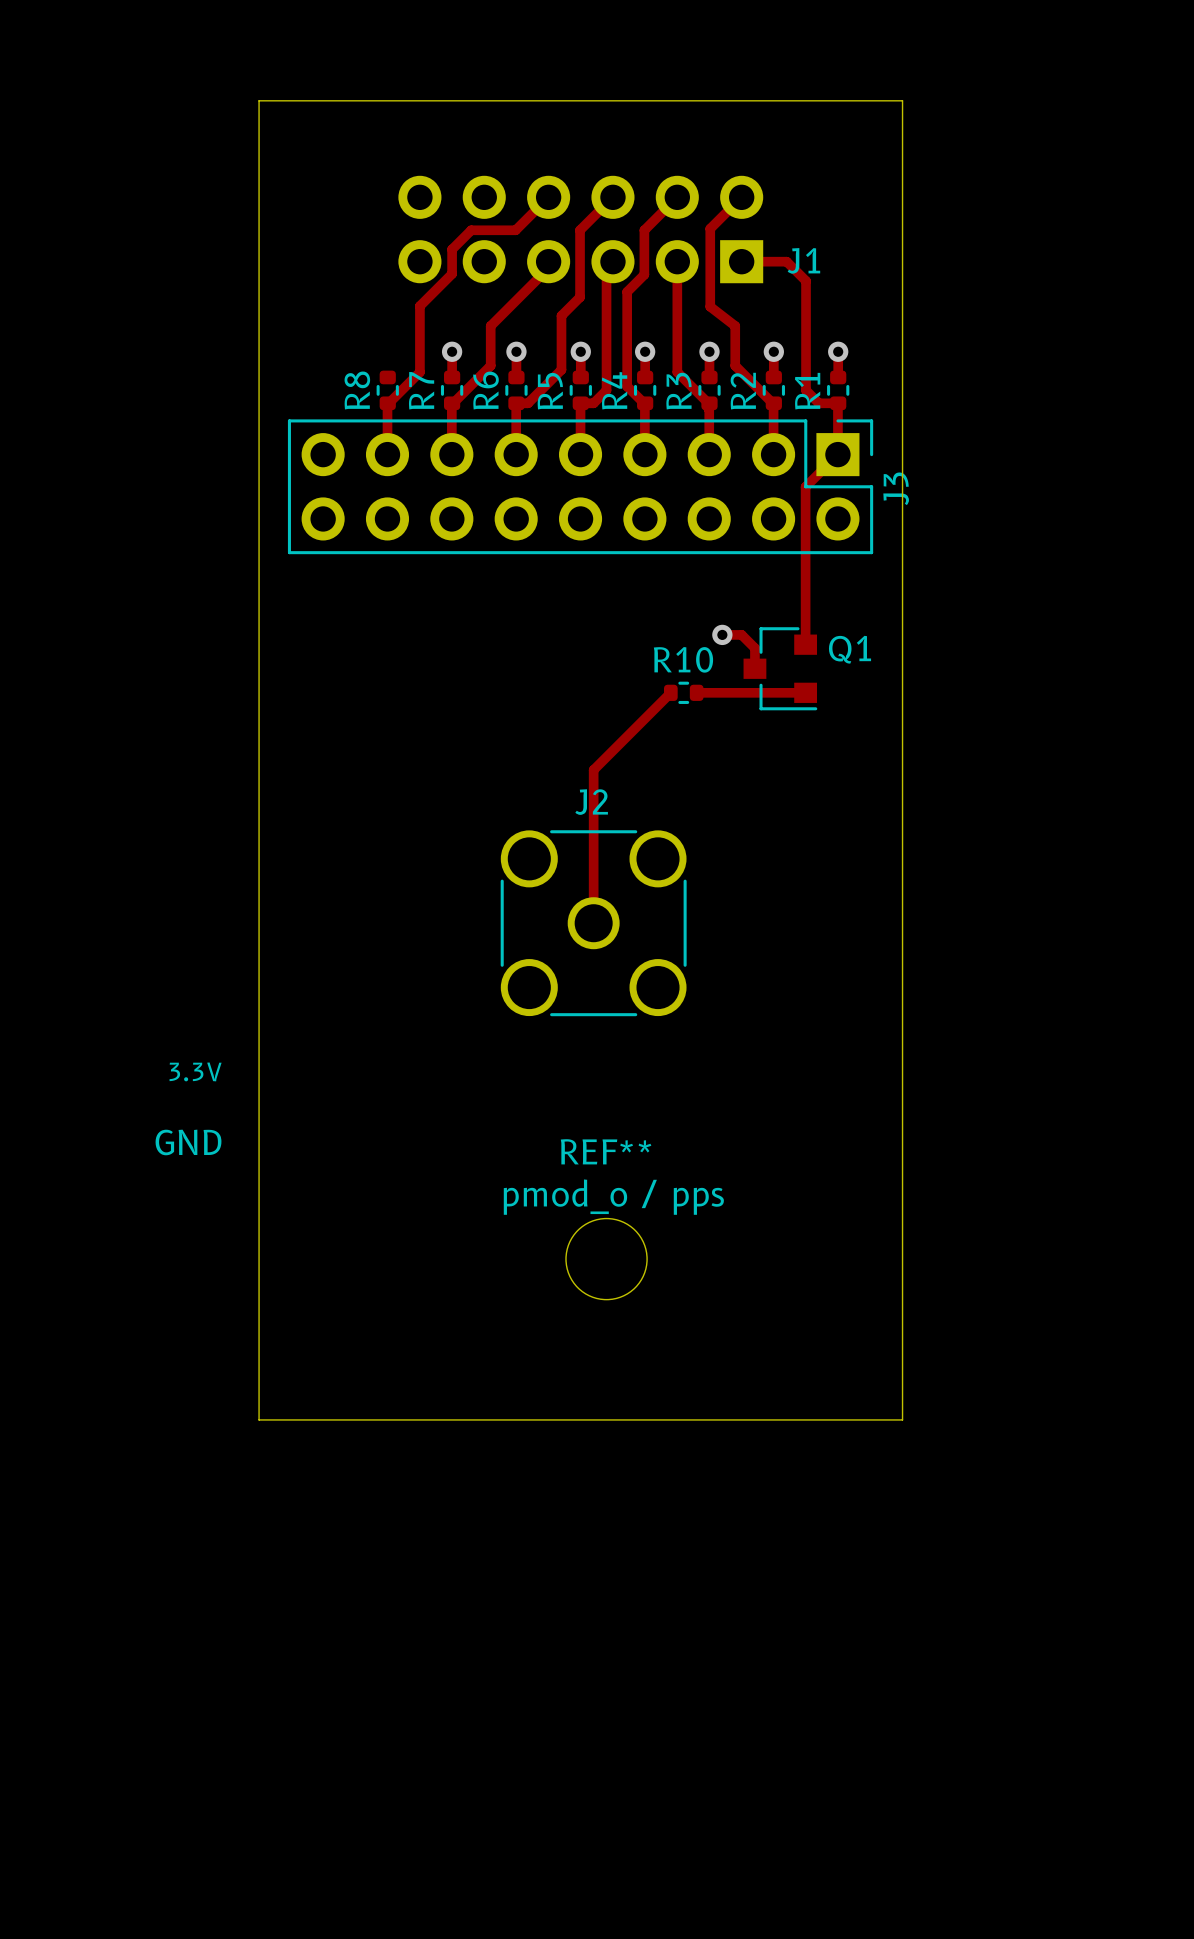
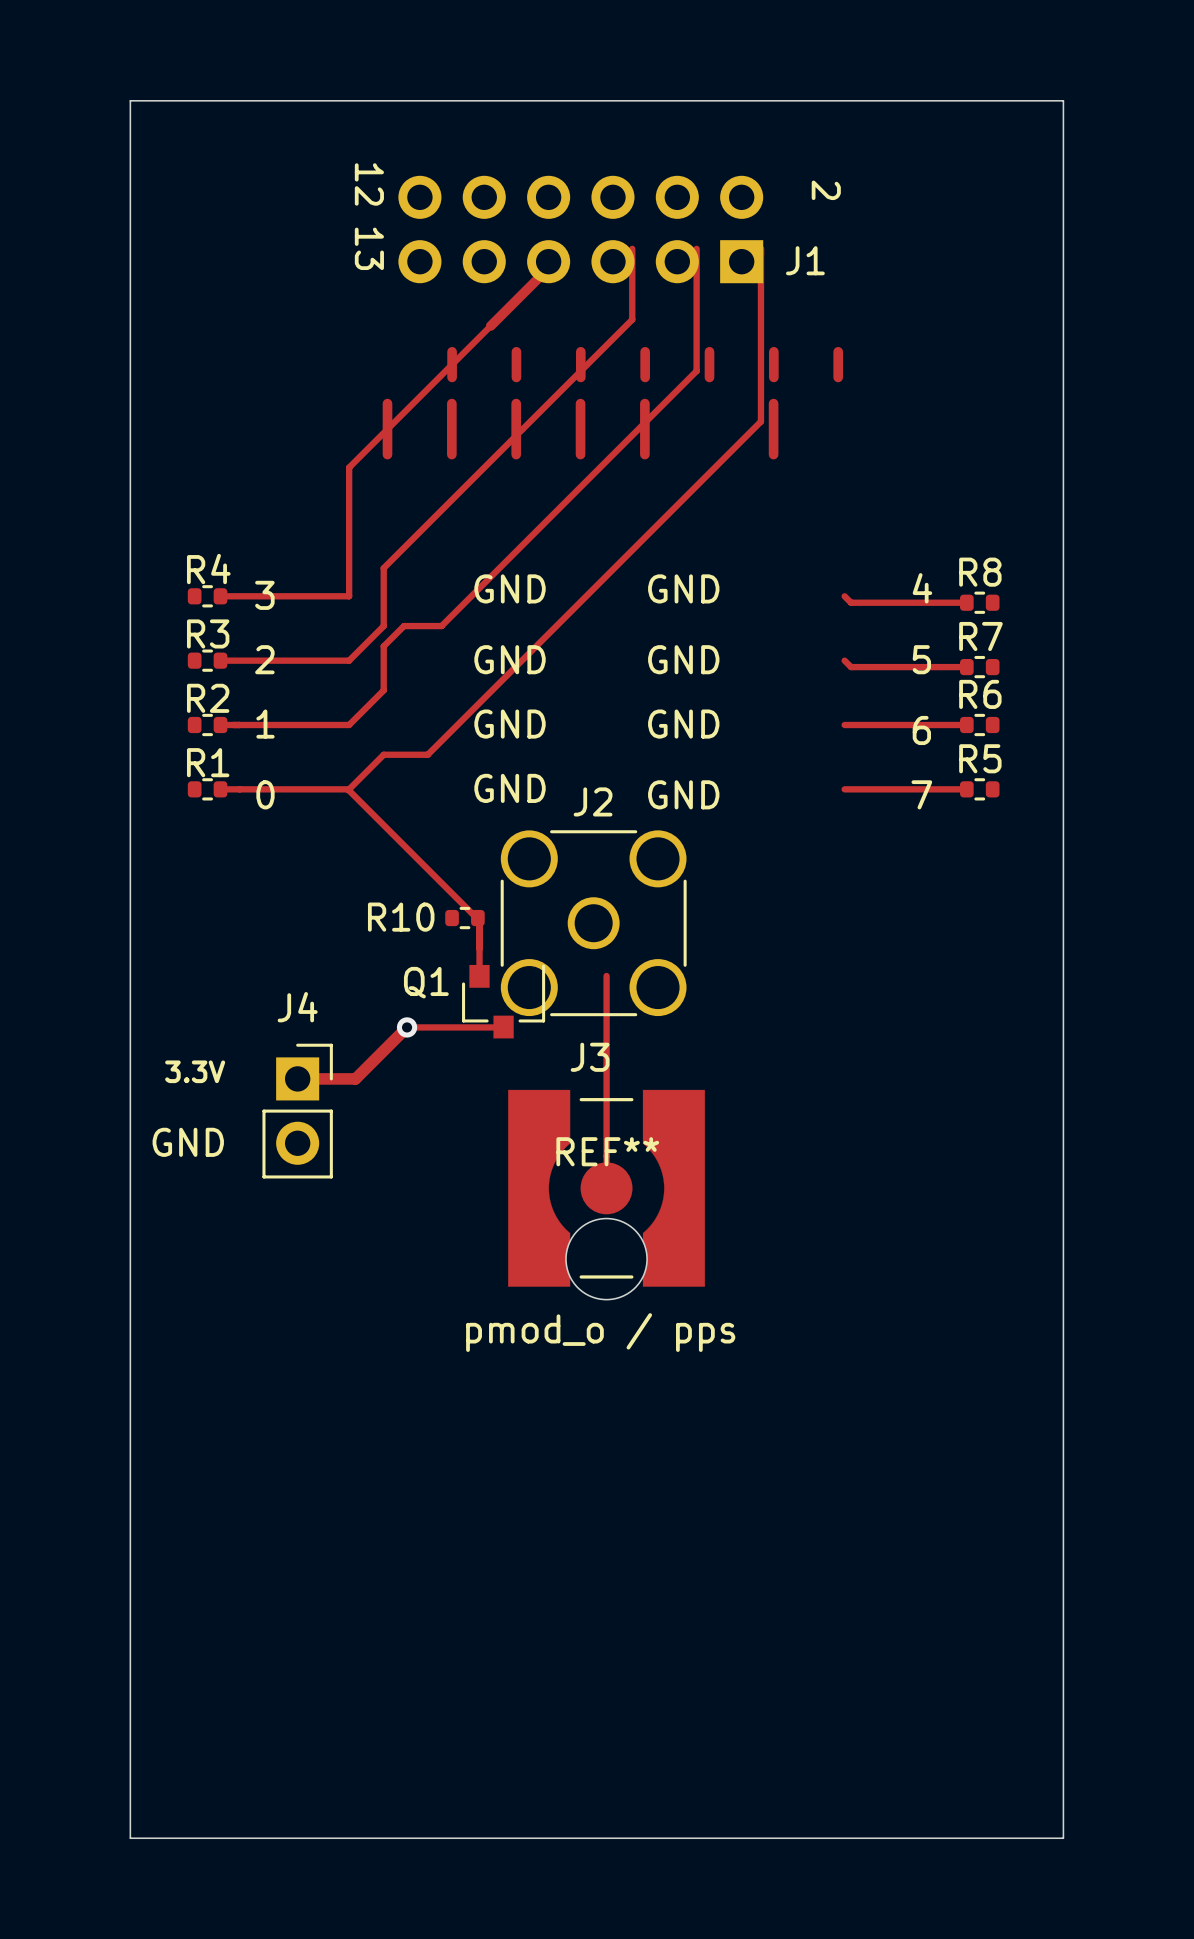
board edge: (259, 100) (259, 1419) (902, 1419) (902, 100) -> (259, 100) (130, 100) (130, 1838) (1063, 1838) (1063, 100) (902, 100)
text: none -> 12 (369, 184)
text: none -> 2 (826, 190)
track: (548, 197) (515, 230) (471, 230) (452, 249) (452, 273) (419, 306) (419, 372) (387, 403) -> none
track: (612, 197) (580, 230) (580, 297) (561, 315) (561, 369) (528, 403) (516, 403) -> none
track: (677, 197) (644, 230) (644, 274) (627, 291) (627, 386) (645, 403) -> none
track: (741, 197) (710, 228) (710, 306) (735, 326) (735, 365) (773, 403) -> none
text: none -> 13 (369, 248)
track: none -> (632, 248) (632, 319) (383, 568) (383, 626) (349, 660) (220, 660)
track: none -> (696, 248) (696, 371) (441, 626) (404, 626) (383, 646) (383, 690) (349, 725) (220, 725)
track: none -> (760, 248) (760, 421) (427, 754) (383, 754) (349, 789)
track: (612, 261) (606, 268) (606, 390) (593, 403) (580, 403) -> none
track: (677, 261) (677, 372) (708, 403) (709, 454) -> none
track: (741, 261) (786, 261) (806, 280) (806, 390) (818, 403) (838, 403) -> none
track: (490, 326) (490, 365) (452, 403) -> (490, 326) (349, 467) (349, 596) (220, 596)
via: (452, 351) -> none
via: (516, 351) -> none
via: (580, 351) -> none
via: (645, 351) -> none
via: (709, 351) -> none
via: (773, 351) -> none
via: (838, 351) -> none
R8 rotation: 0° (387, 390) -> 90° clockwise (979, 602)
R8 position: (387, 390) -> (979, 602)
R7 rotation: 0° (452, 390) -> 90° clockwise (979, 667)
R7 position: (452, 390) -> (979, 667)
R6 rotation: 0° (516, 390) -> 90° clockwise (979, 725)
R6 position: (516, 390) -> (979, 725)
R5 rotation: 0° (580, 390) -> 90° clockwise (979, 789)
R5 position: (580, 390) -> (979, 789)
R4 rotation: 0° (645, 390) -> 90° clockwise (207, 596)
R4 position: (645, 390) -> (207, 596)
R3 rotation: 0° (709, 390) -> 90° clockwise (207, 660)
R3 position: (709, 390) -> (207, 660)
R2 rotation: 0° (773, 390) -> 90° clockwise (207, 725)
R2 position: (773, 390) -> (207, 725)
R1 rotation: 0° (838, 390) -> 90° clockwise (207, 789)
R1 position: (838, 390) -> (207, 789)
track: (837, 403) (837, 454) (805, 486) (805, 644) -> none
J3 footprint: [287, 419, 874, 555] -> [508, 1089, 705, 1287]
J3 name position: J3 (896, 488) -> J3 (590, 1057)
text: none -> 4 (922, 588)
text: none -> GND (510, 588)
text: none -> GND (683, 588)
text: none -> 3 (264, 595)
track: none -> (844, 596) (851, 602) (966, 602)
track: (722, 634) (741, 634) (754, 648) (754, 668) -> none
via: (722, 634) -> none
Q1 name position: Q1 (850, 649) -> Q1 (426, 982)
text: none -> 2 (264, 659)
text: none -> GND (510, 659)
R10 name position: R10 (683, 659) -> R10 (401, 917)
text: none -> GND (683, 659)
text: none -> 5 (921, 659)
track: none -> (844, 660) (851, 667) (966, 667)
Q1 rotation: 0° (780, 668) -> 90° counterclockwise (503, 1001)
Q1 position: (780, 668) -> (503, 1001)
track: (670, 692) (593, 769) (593, 923) -> none
R10 position: (683, 692) -> (464, 918)
track: (696, 692) (805, 692) -> none
text: none -> 1 (265, 724)
text: none -> GND (510, 724)
text: none -> GND (683, 724)
track: none -> (844, 725) (966, 725)
text: none -> 6 (921, 730)
text: none -> GND (510, 788)
track: none -> (220, 789) (349, 789)
track: none -> (349, 789) (479, 920)
track: none -> (844, 789) (966, 789)
text: none -> GND (683, 794)
text: none -> 0 (265, 794)
text: none -> 7 (921, 794)
track: none -> (477, 918) (479, 919) (479, 976)
track: none -> (606, 975) (606, 1188)
via: none -> (407, 1027)
track: none -> (503, 1027) (407, 1027) (355, 1078) (297, 1078)
J4: none -> (297, 1111)
text position: pmod_o / pps (613, 1197) -> pmod_o / pps (600, 1332)

